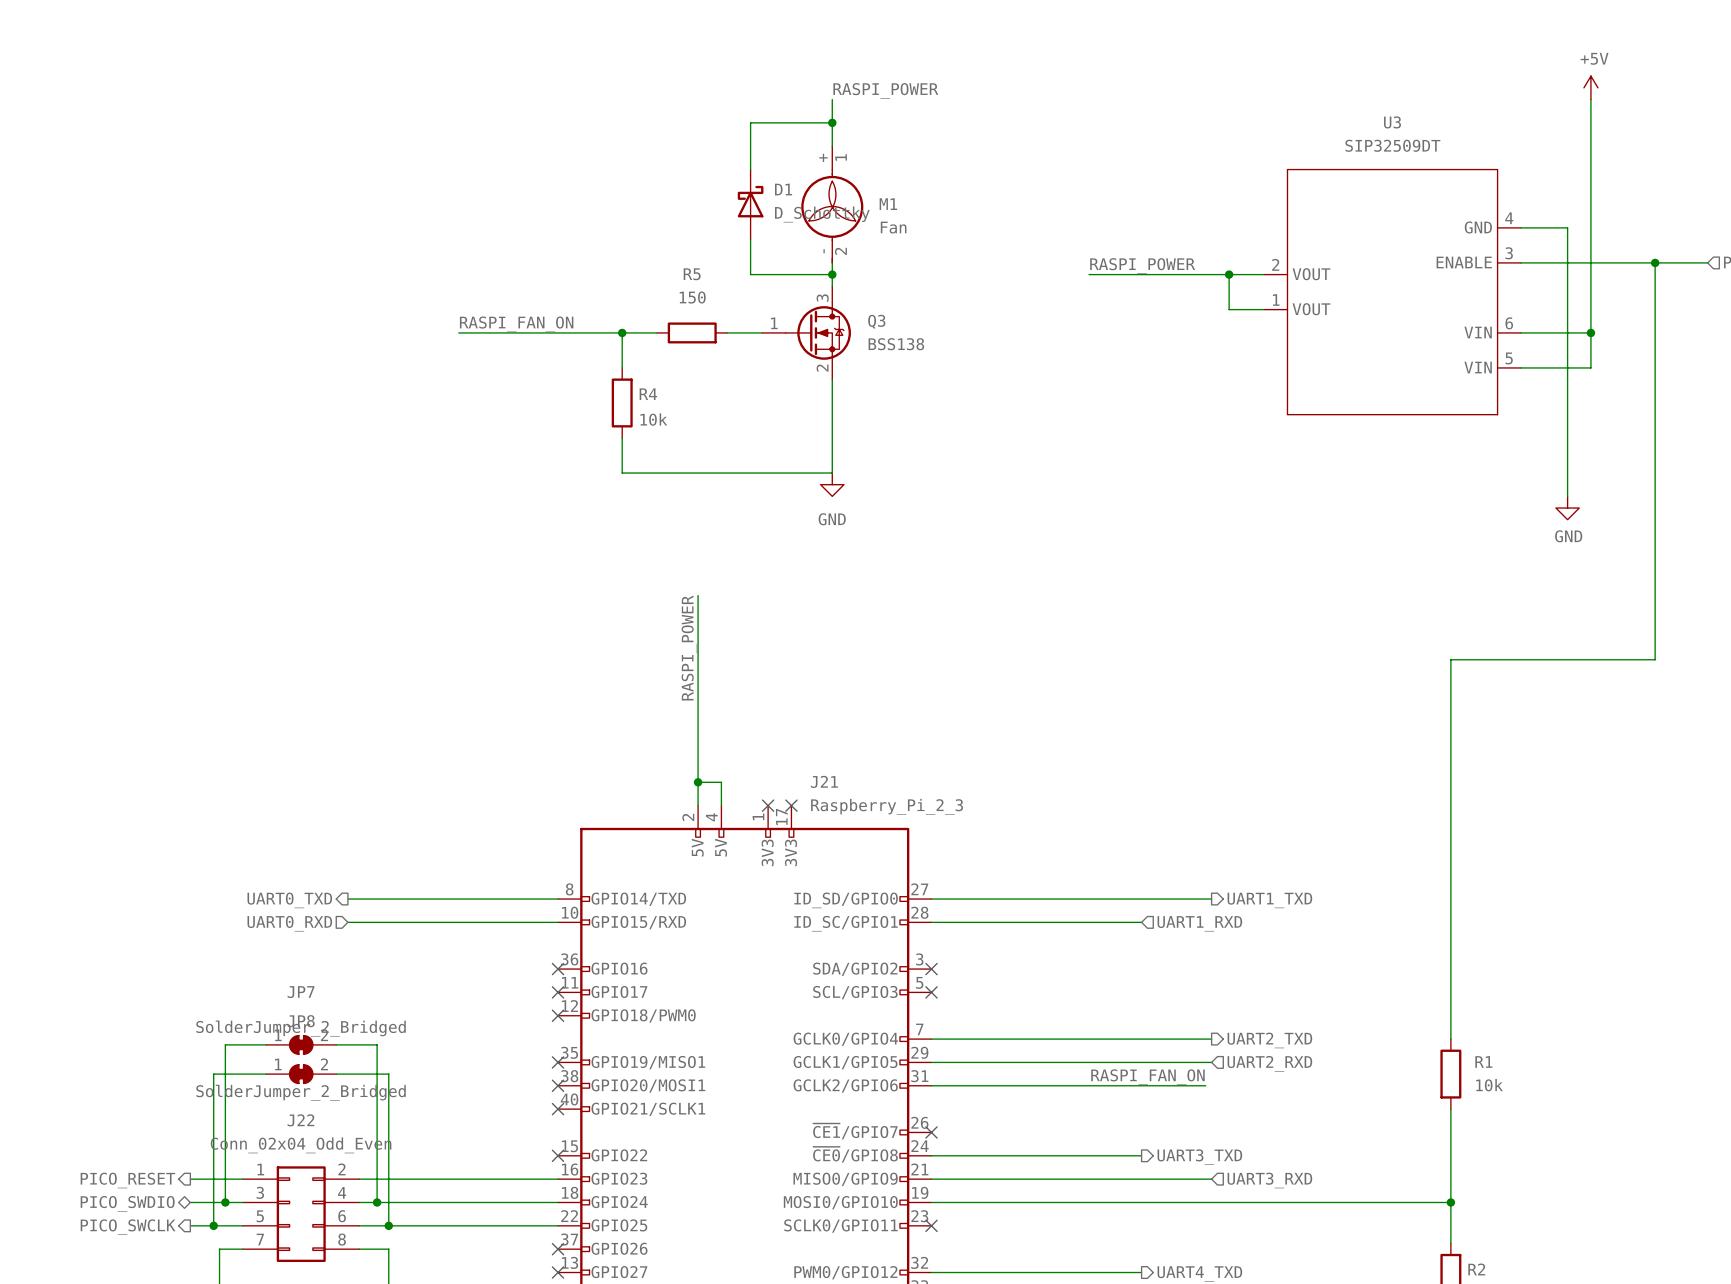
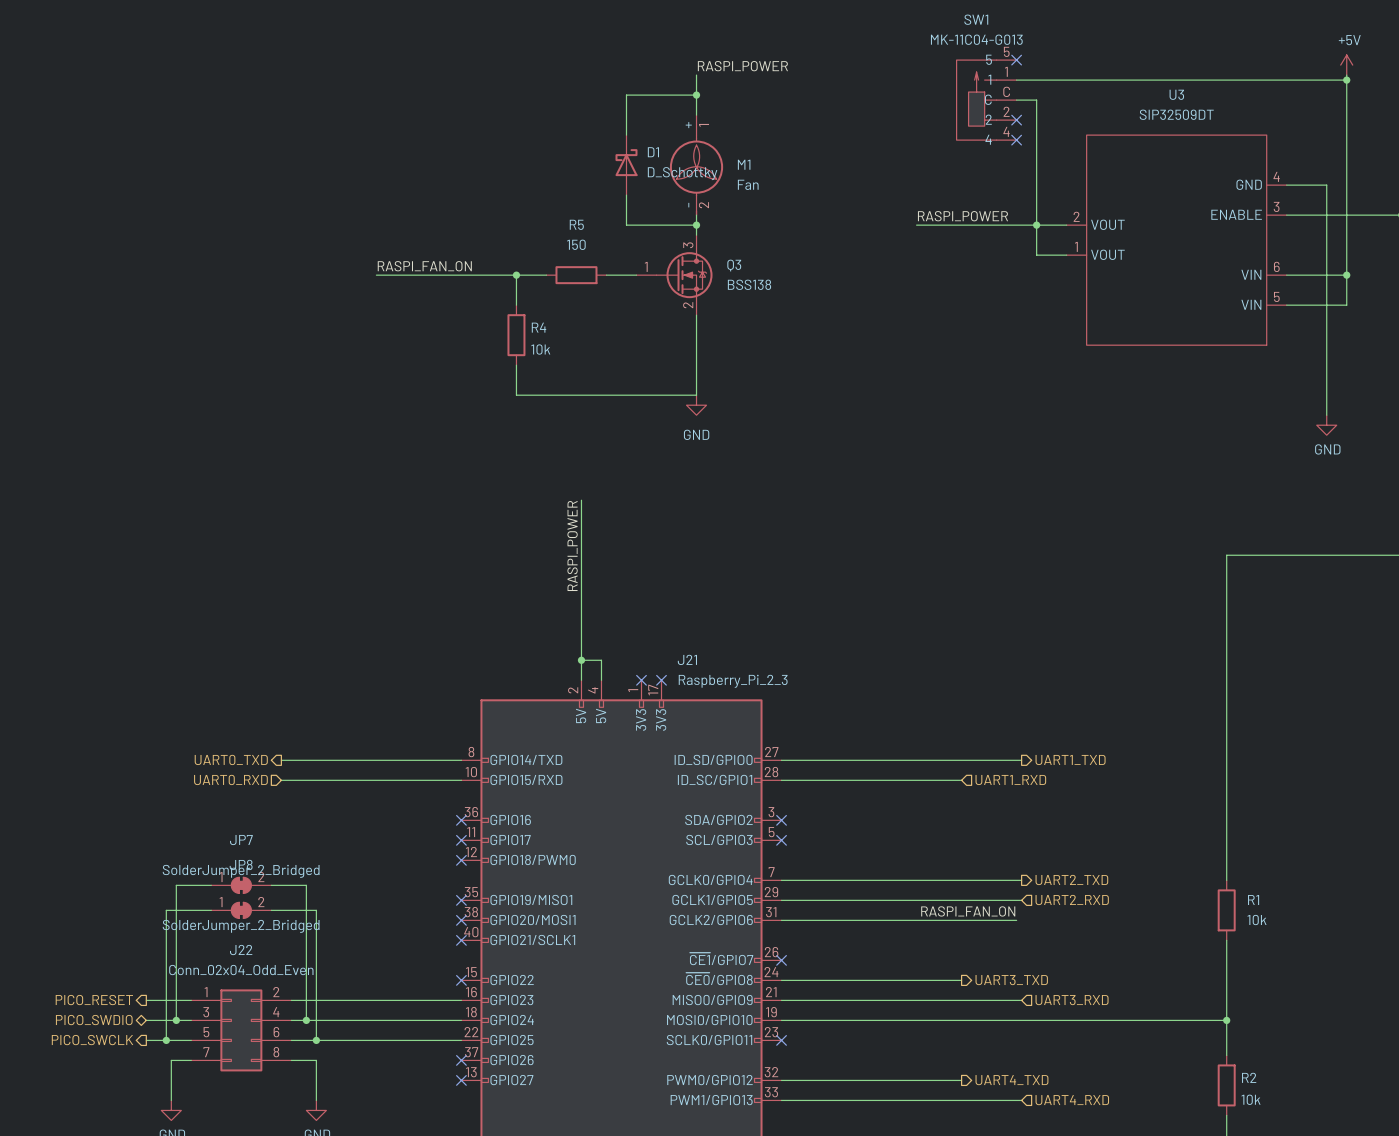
no-connect mark: none -> (1016, 60)
wire: none -> (1016, 80) (1346, 80)
junction: none -> (1346, 80)
SW1: none -> MK-11C04-G013 (986, 100)
wire: none -> (1016, 100) (1036, 100) (1036, 225)
no-connect mark: none -> (1016, 120)
no-connect mark: none -> (1016, 140)

